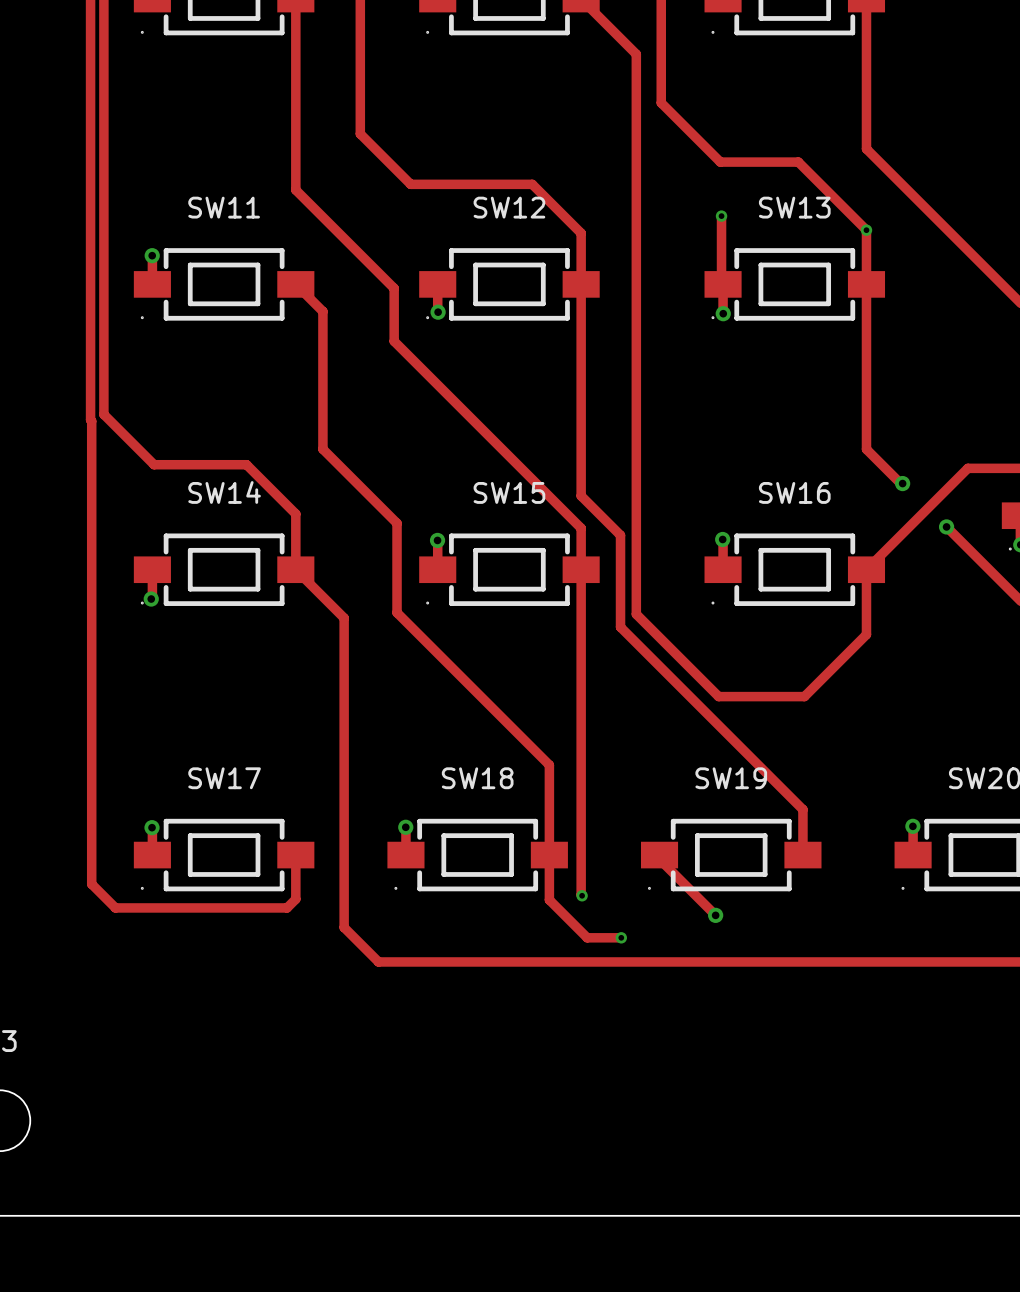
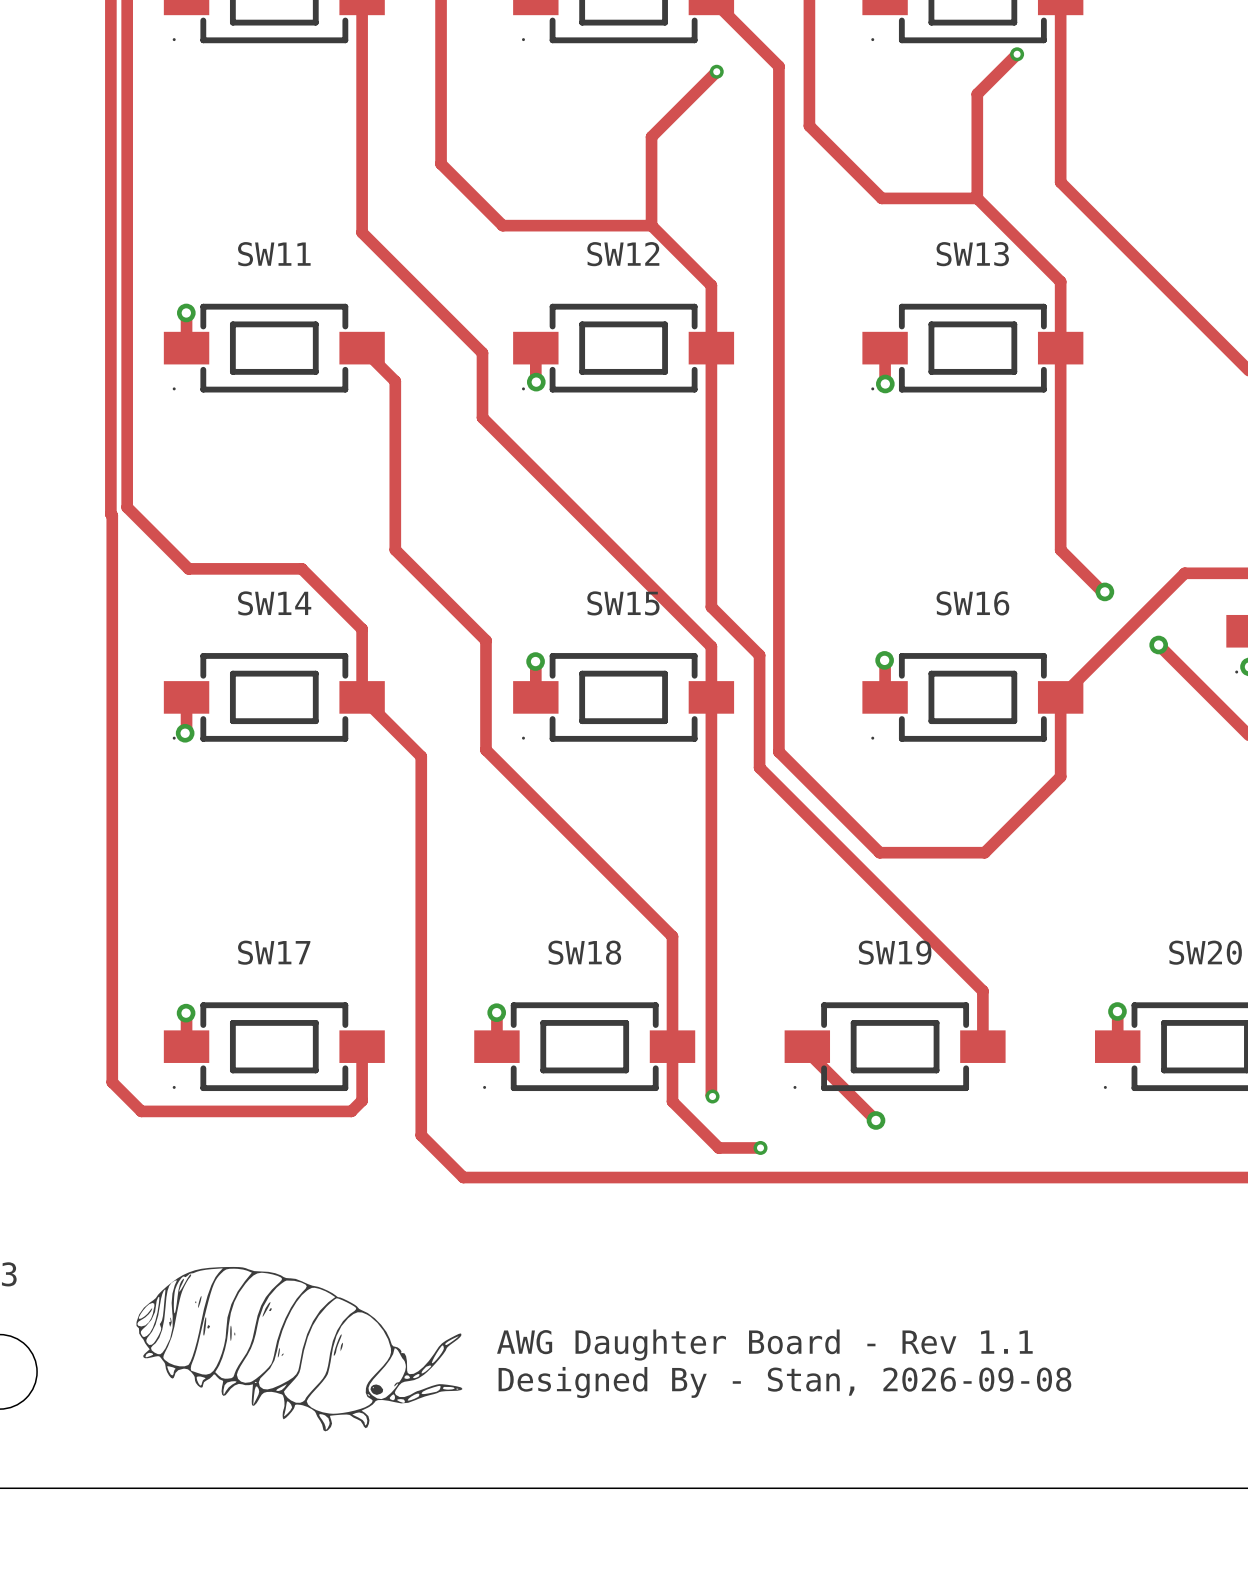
track: none -> (1017, 54) (977, 94) (977, 198)
via: none -> (1017, 54)
track: none -> (716, 71) (651, 136) (651, 225)
via: none -> (716, 71)
track: (721, 216) (721, 282) -> none
via: (721, 216) -> none
via: (866, 230) -> none
drawing: none -> [136, 1266, 463, 1432]
text: none -> AWG Daughter Board - Rev 1.1 (764, 1345)
text: none -> Designed By - Stan, 2026-09-08 (784, 1382)

